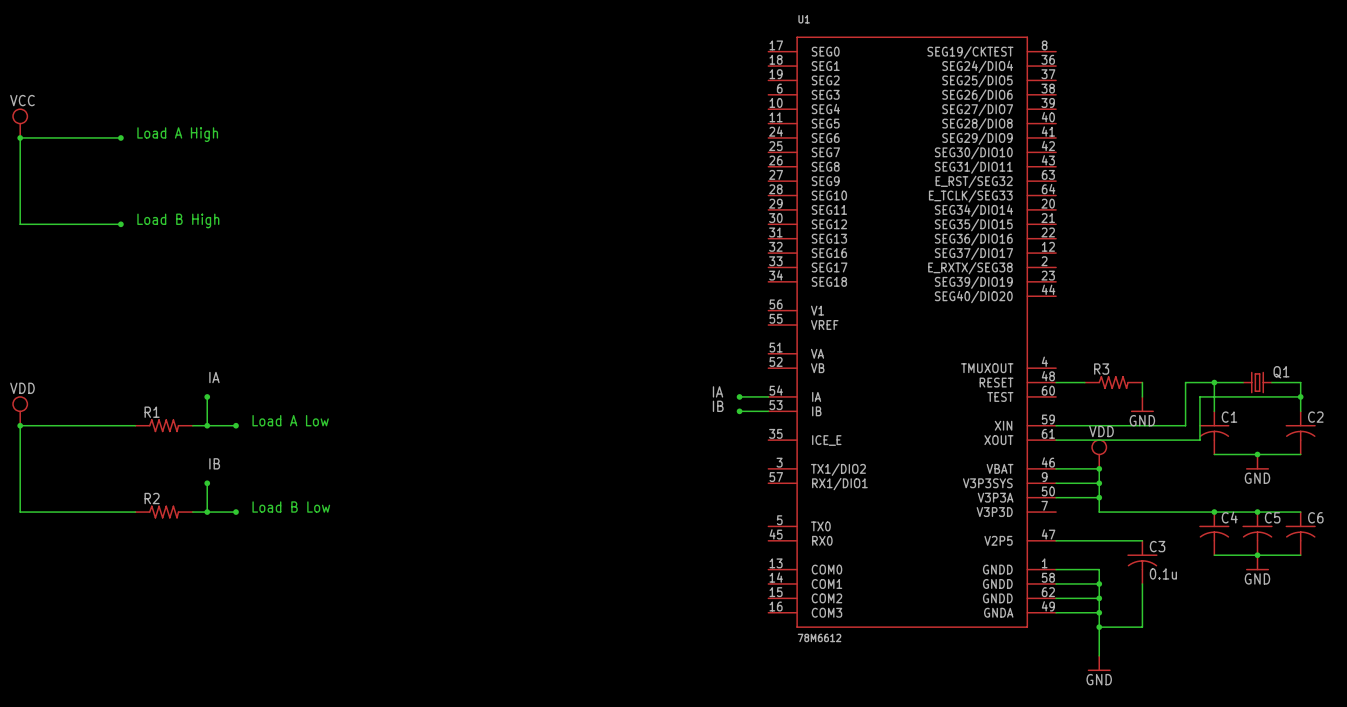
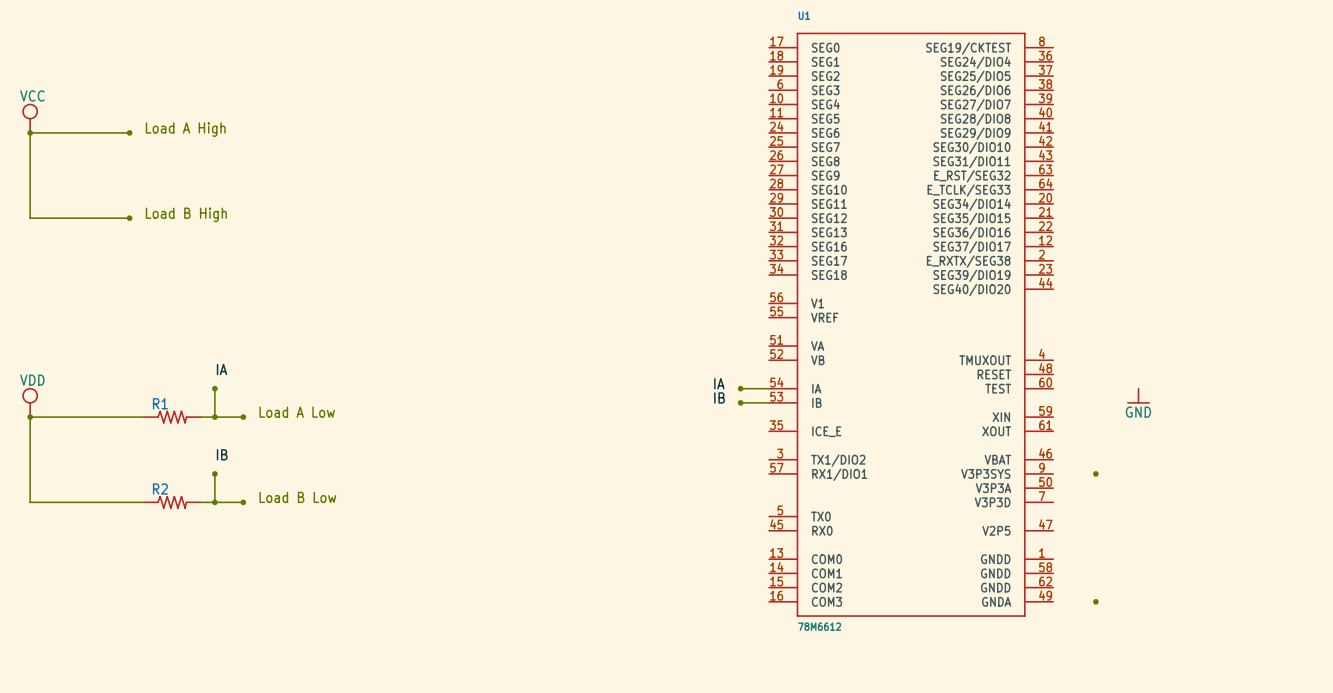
wire: (1056, 382) (1084, 382) -> none
R3: (1113, 382) -> none
wire: (1142, 382) (1142, 396) -> none
wire: (1214, 382) (1214, 411) -> none
junction: (1214, 382) -> none
wire: (1243, 382) (1185, 382) (1185, 425) (1056, 425) -> none
Q1: (1257, 382) -> none
wire: (1271, 382) (1300, 382) (1300, 411) -> none
wire: (1300, 396) (1199, 396) (1199, 440) (1056, 440) -> none
junction: (1300, 396) -> none
C1: (1214, 432) -> none
C2: (1300, 432) -> none
power symbol: VDD (1099, 454) -> none
wire: (1214, 454) (1300, 454) -> none
junction: (1257, 454) -> none
power symbol: GND (1257, 462) -> none
wire: (1056, 468) (1099, 468) (1099, 512) (1300, 512) -> none
junction: (1099, 468) -> none
wire: (1056, 483) (1099, 483) -> none
wire: (1056, 497) (1099, 497) -> none
junction: (1099, 497) -> none
junction: (1214, 512) -> none
junction: (1257, 512) -> none
C4: (1214, 533) -> none
C5: (1257, 533) -> none
C6: (1300, 533) -> none
wire: (1056, 540) (1142, 540) -> none
wire: (1214, 555) (1300, 555) -> none
junction: (1257, 555) -> none
C3: 0.1u (1142, 562) -> none
power symbol: GND (1257, 562) -> none
wire: (1056, 569) (1099, 569) (1099, 655) -> none
wire: (1056, 583) (1099, 583) -> none
junction: (1099, 583) -> none
wire: (1142, 583) (1142, 627) (1099, 627) -> none
wire: (1056, 598) (1099, 598) -> none
junction: (1099, 598) -> none
wire: (1056, 612) (1099, 612) -> none
junction: (1099, 627) -> none
power symbol: GND (1099, 663) -> none

